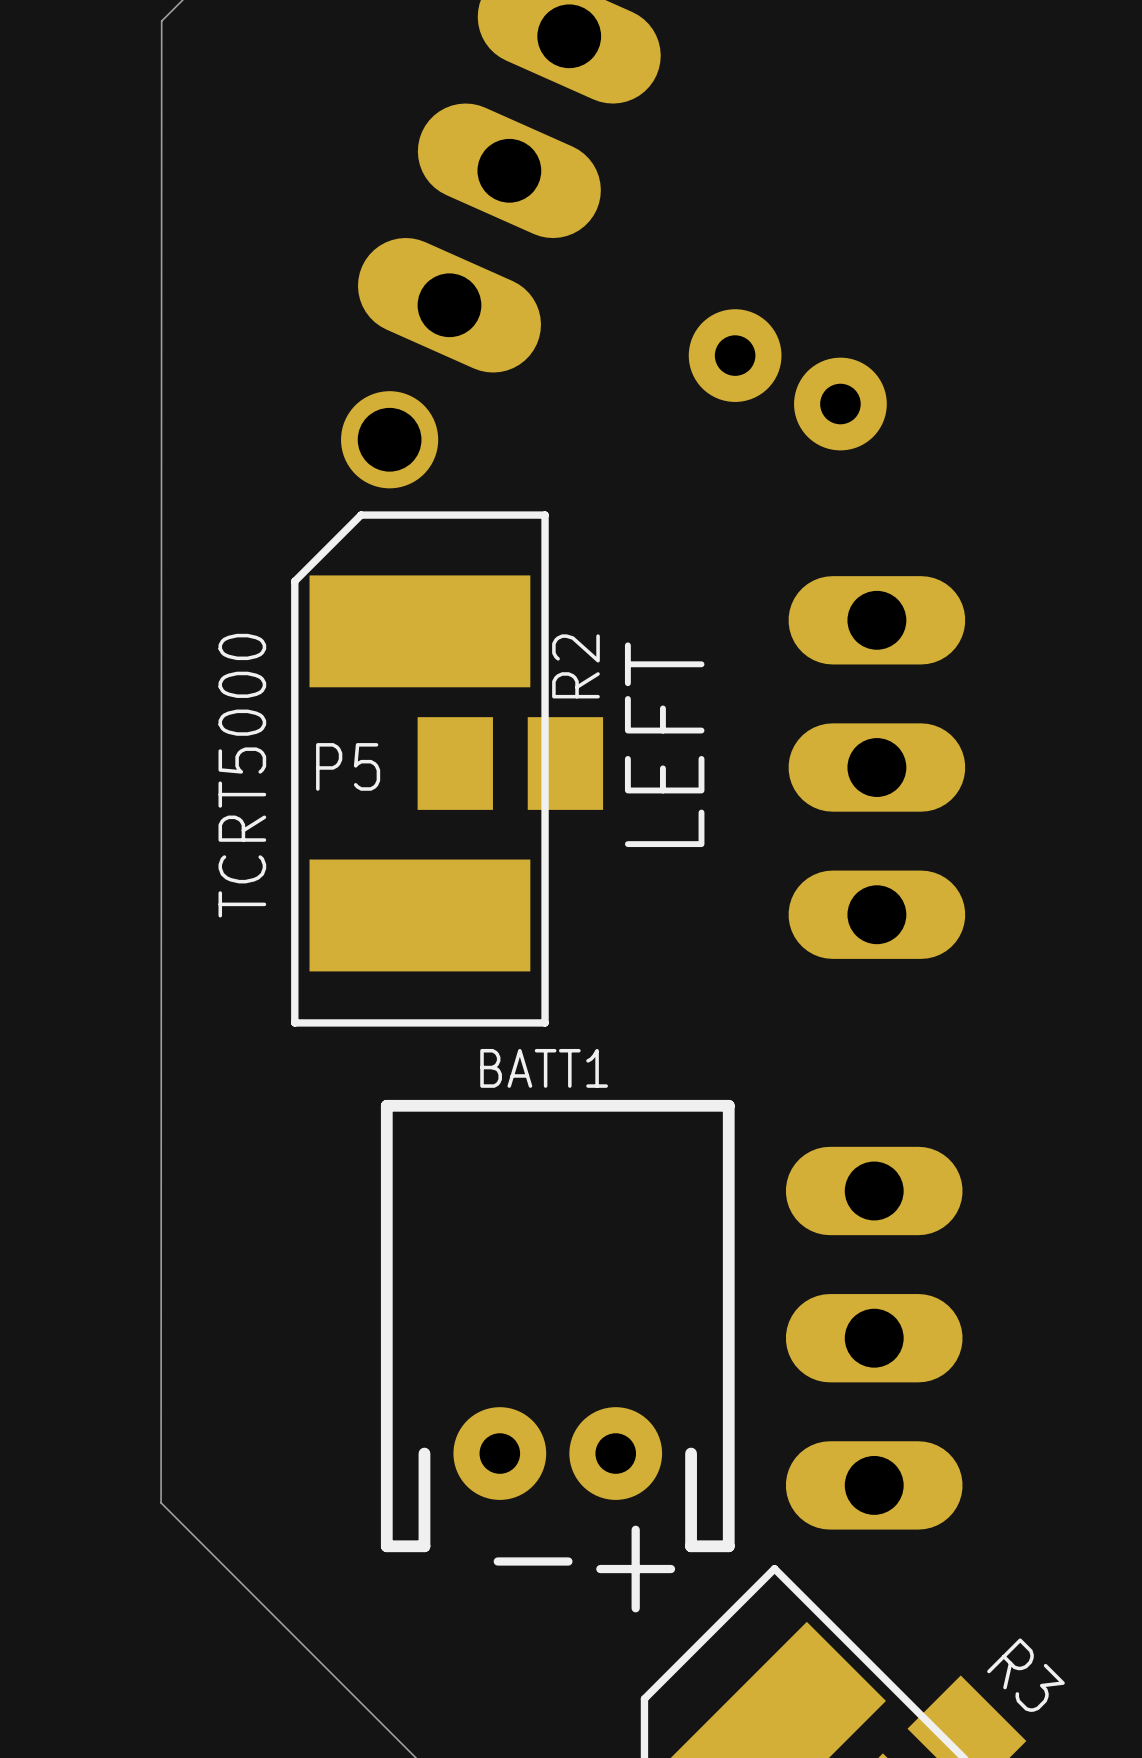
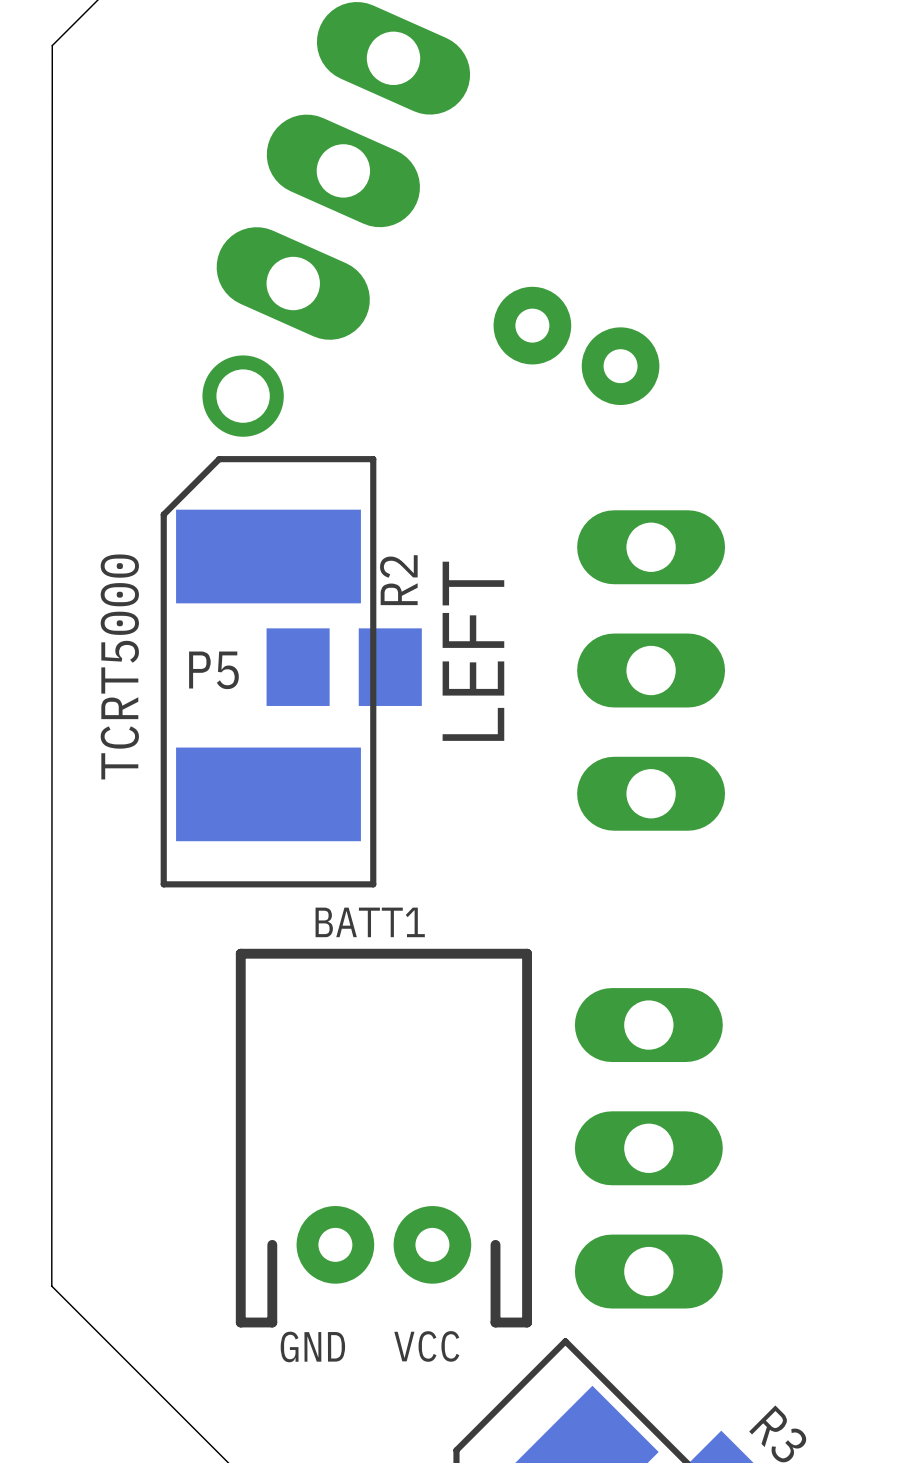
text: - (533, 1561) -> GND VCC (369, 1346)
text: + (635, 1569) -> none

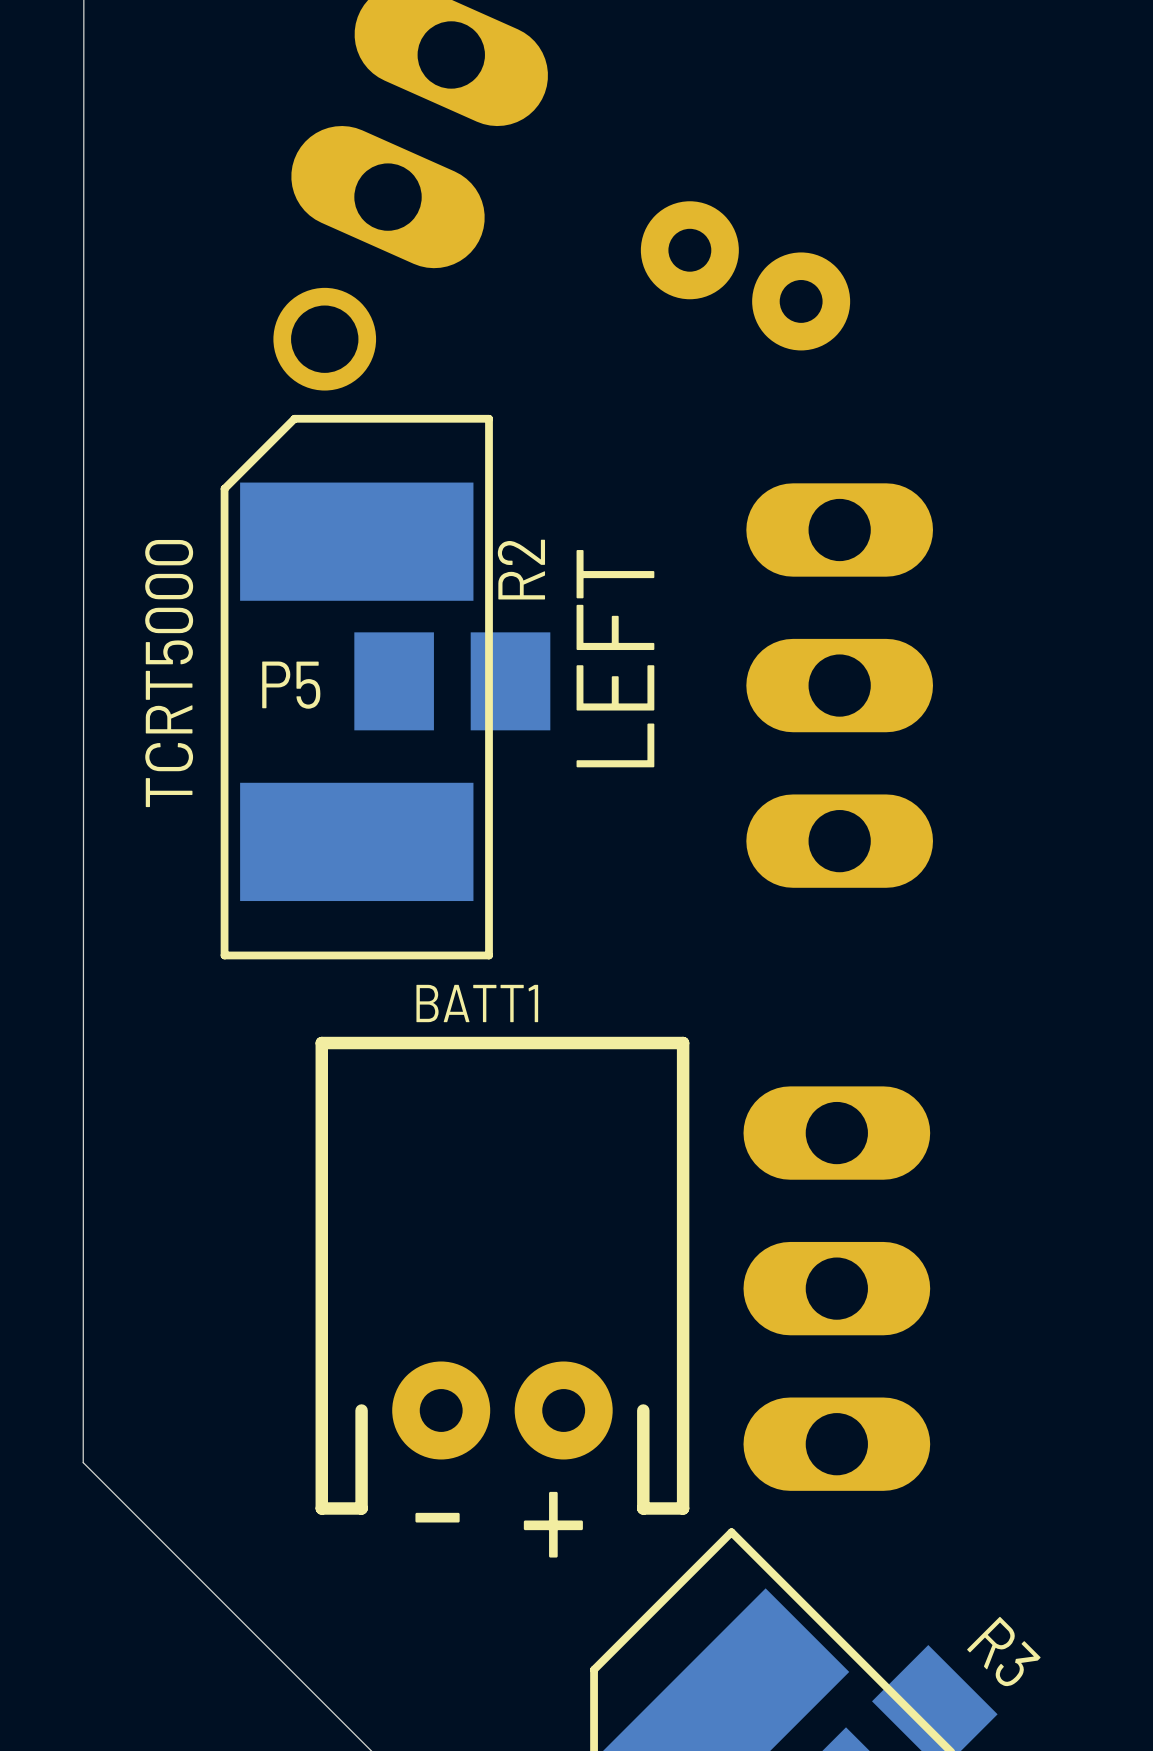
text: none -> + (553, 1524)
text: GND VCC (369, 1346) -> - (437, 1517)

